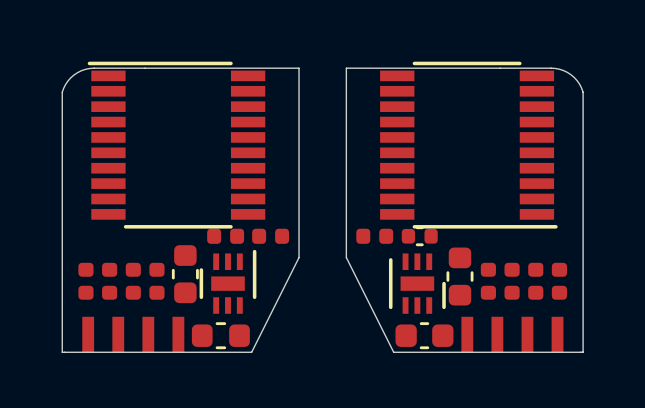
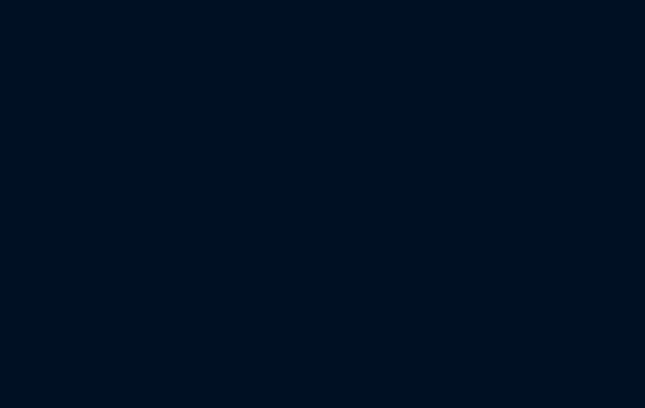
board edge: (94, 68) (299, 68) (299, 257) (251, 352) (62, 352) (62, 92) (65, 84) (74, 74) (81, 70) (94, 68) -> none
board edge: (346, 68) (551, 68) (563, 70) (577, 80) (583, 92) (583, 352) (393, 352) (346, 257) (346, 68) -> none
part: (176, 145) -> none
part: (468, 145) -> none
part: (225, 236) -> none
part: (270, 236) -> none
part: (374, 236) -> none
part: (419, 236) -> none
part: (185, 274) -> none
part: (459, 276) -> none
part: (85, 281) -> none
part: (109, 281) -> none
part: (133, 281) -> none
part: (156, 281) -> none
part: (227, 281) -> none
part: (488, 281) -> none
part: (512, 281) -> none
part: (535, 281) -> none
part: (559, 281) -> none
part: (417, 283) -> none
part: (133, 334) -> none
part: (512, 334) -> none
part: (220, 335) -> none
part: (424, 335) -> none

